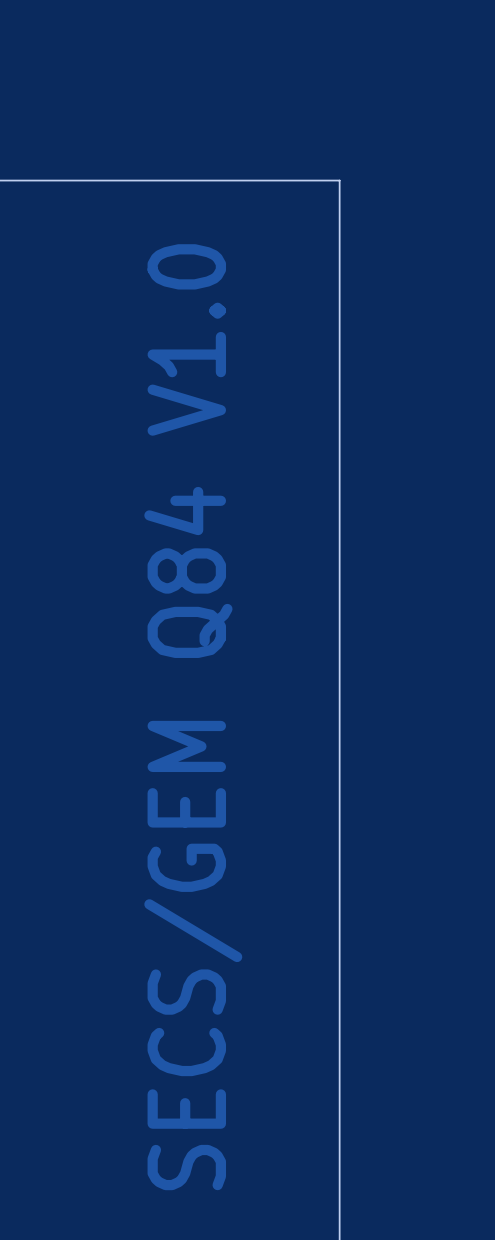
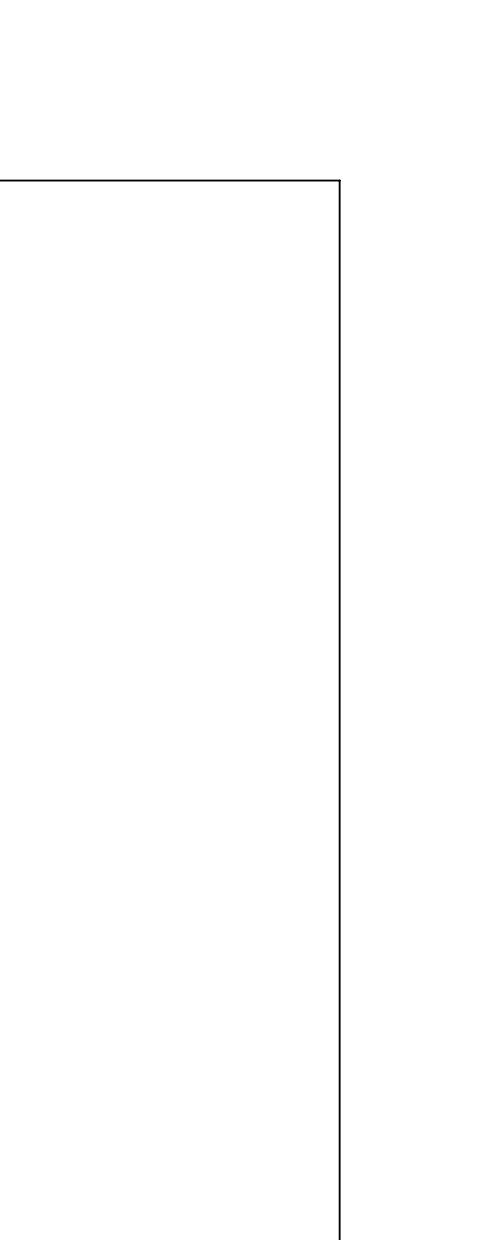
text: SECS/GEM Q84 V1.0 (193, 717) -> none

